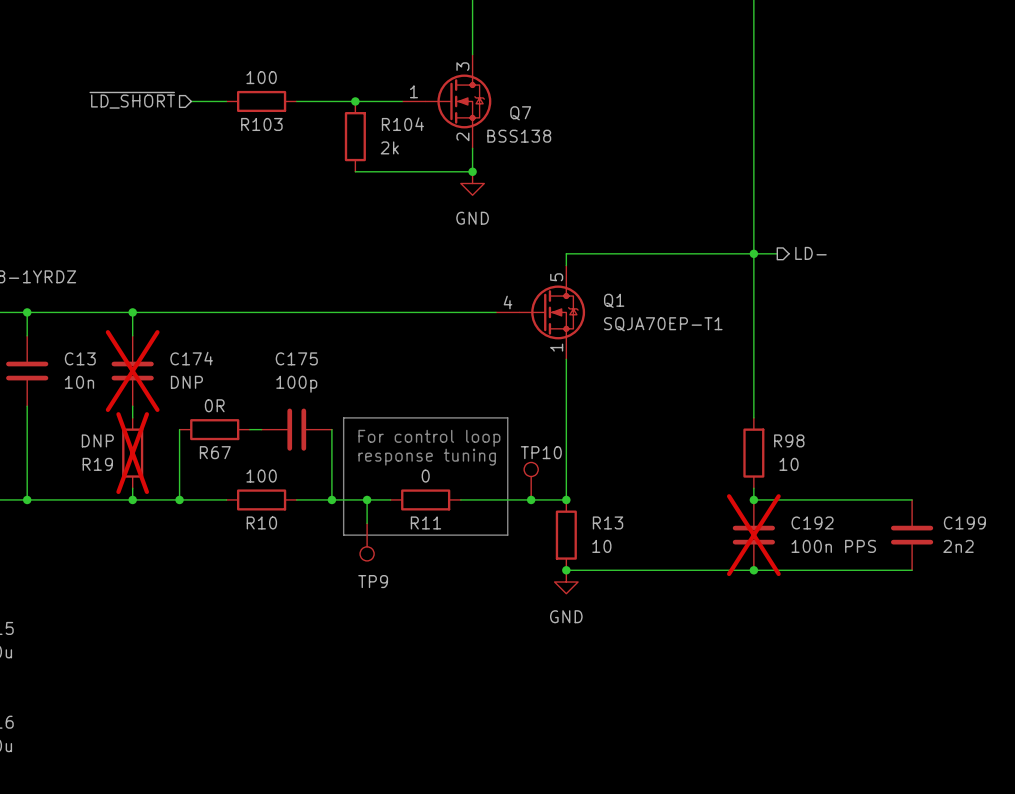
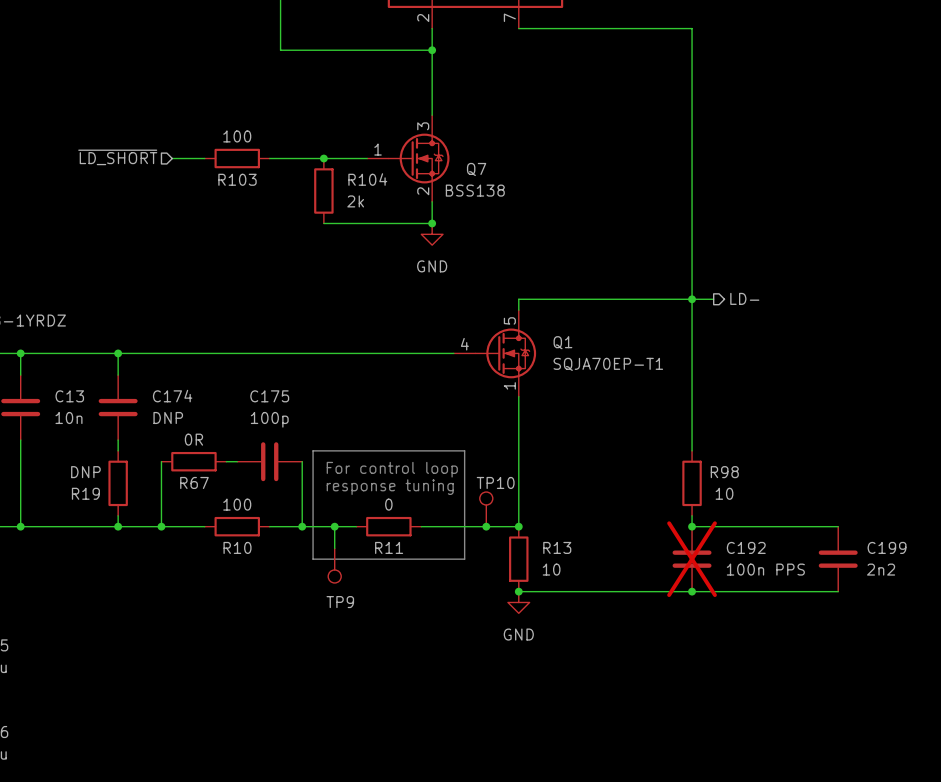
C174 do-not-place cross: (132, 371) -> none
R19 do-not-place cross: (132, 453) -> none

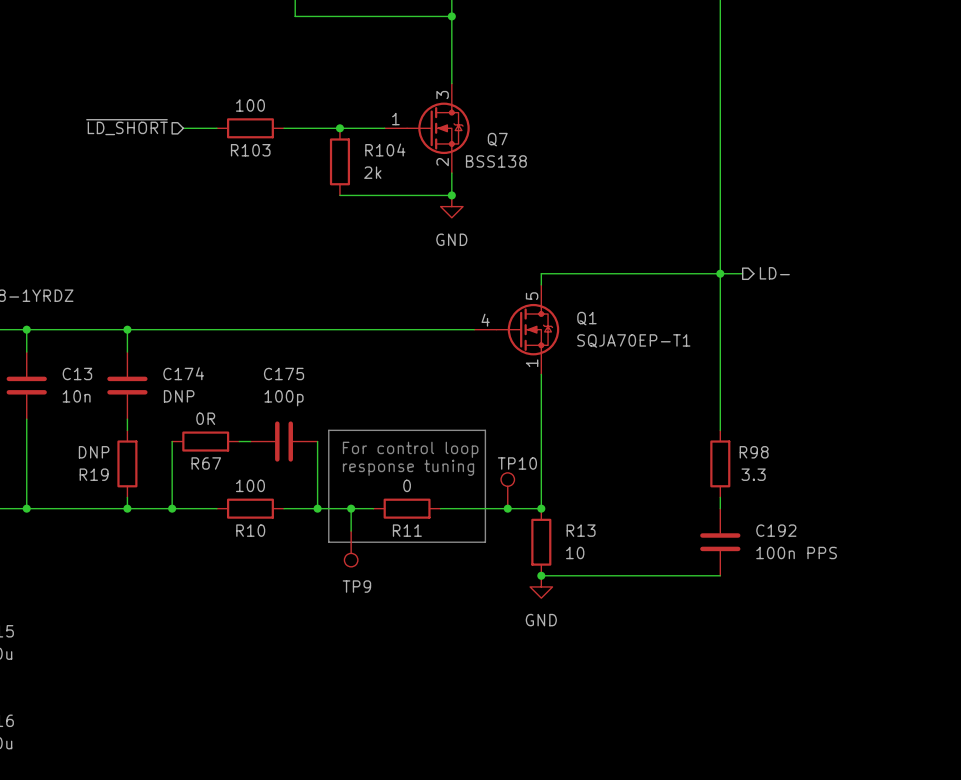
R98 value: 10 (724, 493) -> 3.3 (753, 474)
wire: (692, 526) (838, 526) -> none
junction: (692, 526) -> none
C192 do-not-place cross: (692, 559) -> none
C199: 2n2 (838, 559) -> none
wire: (692, 591) (838, 591) -> none
junction: (692, 591) -> none

